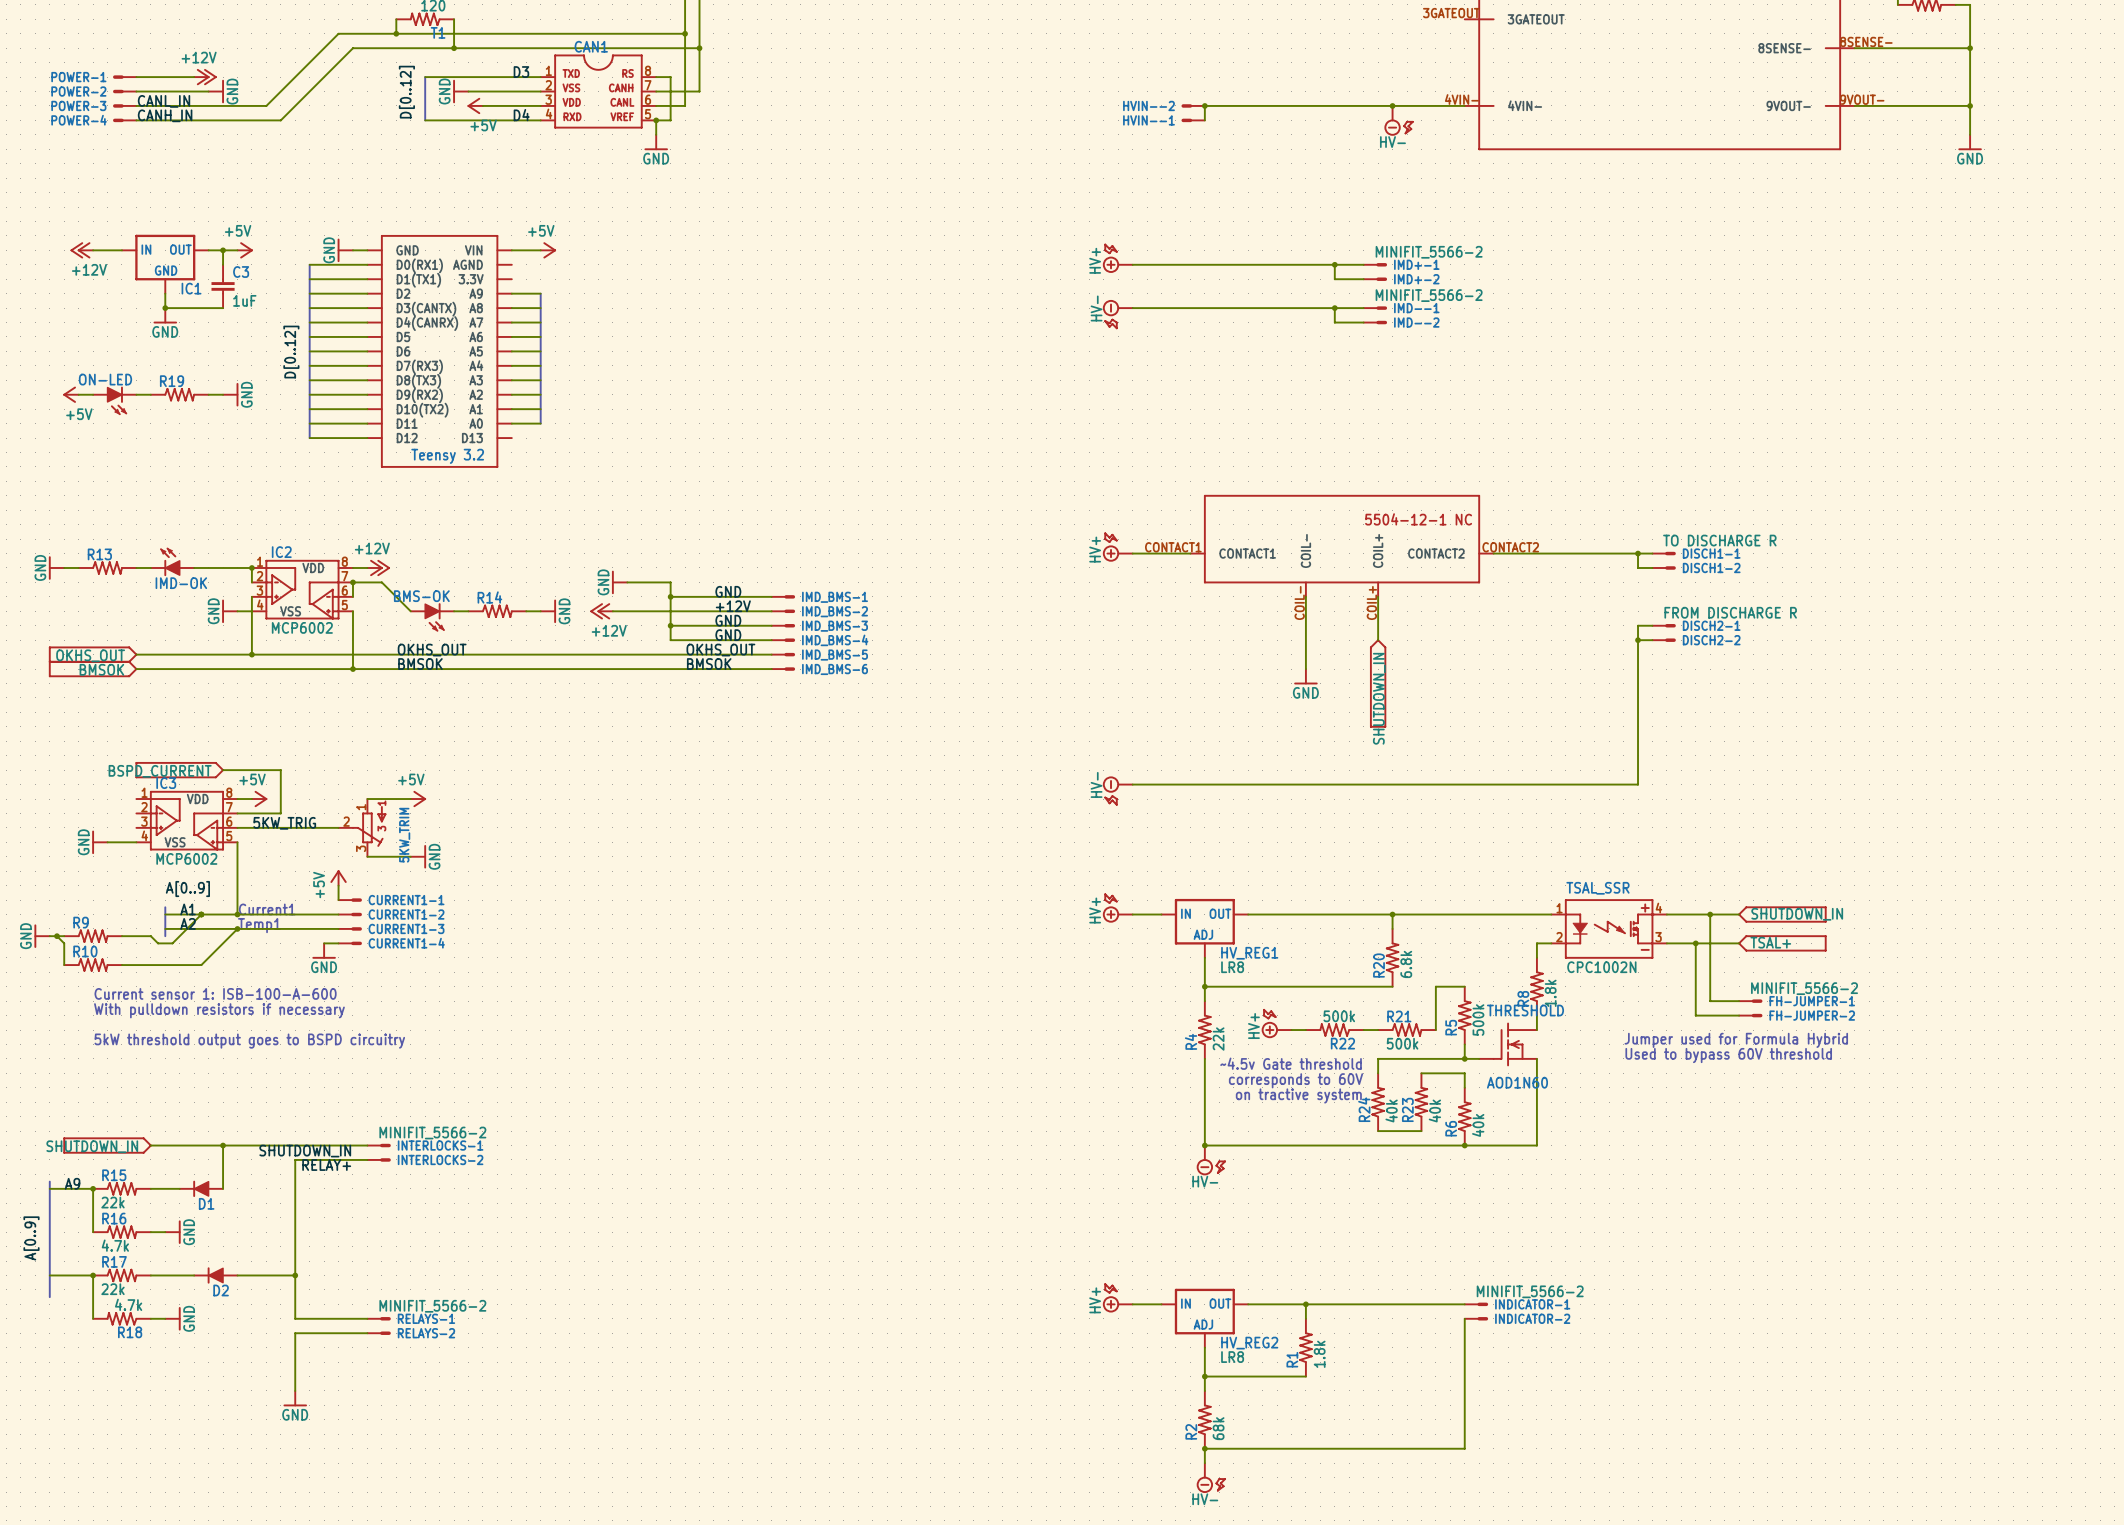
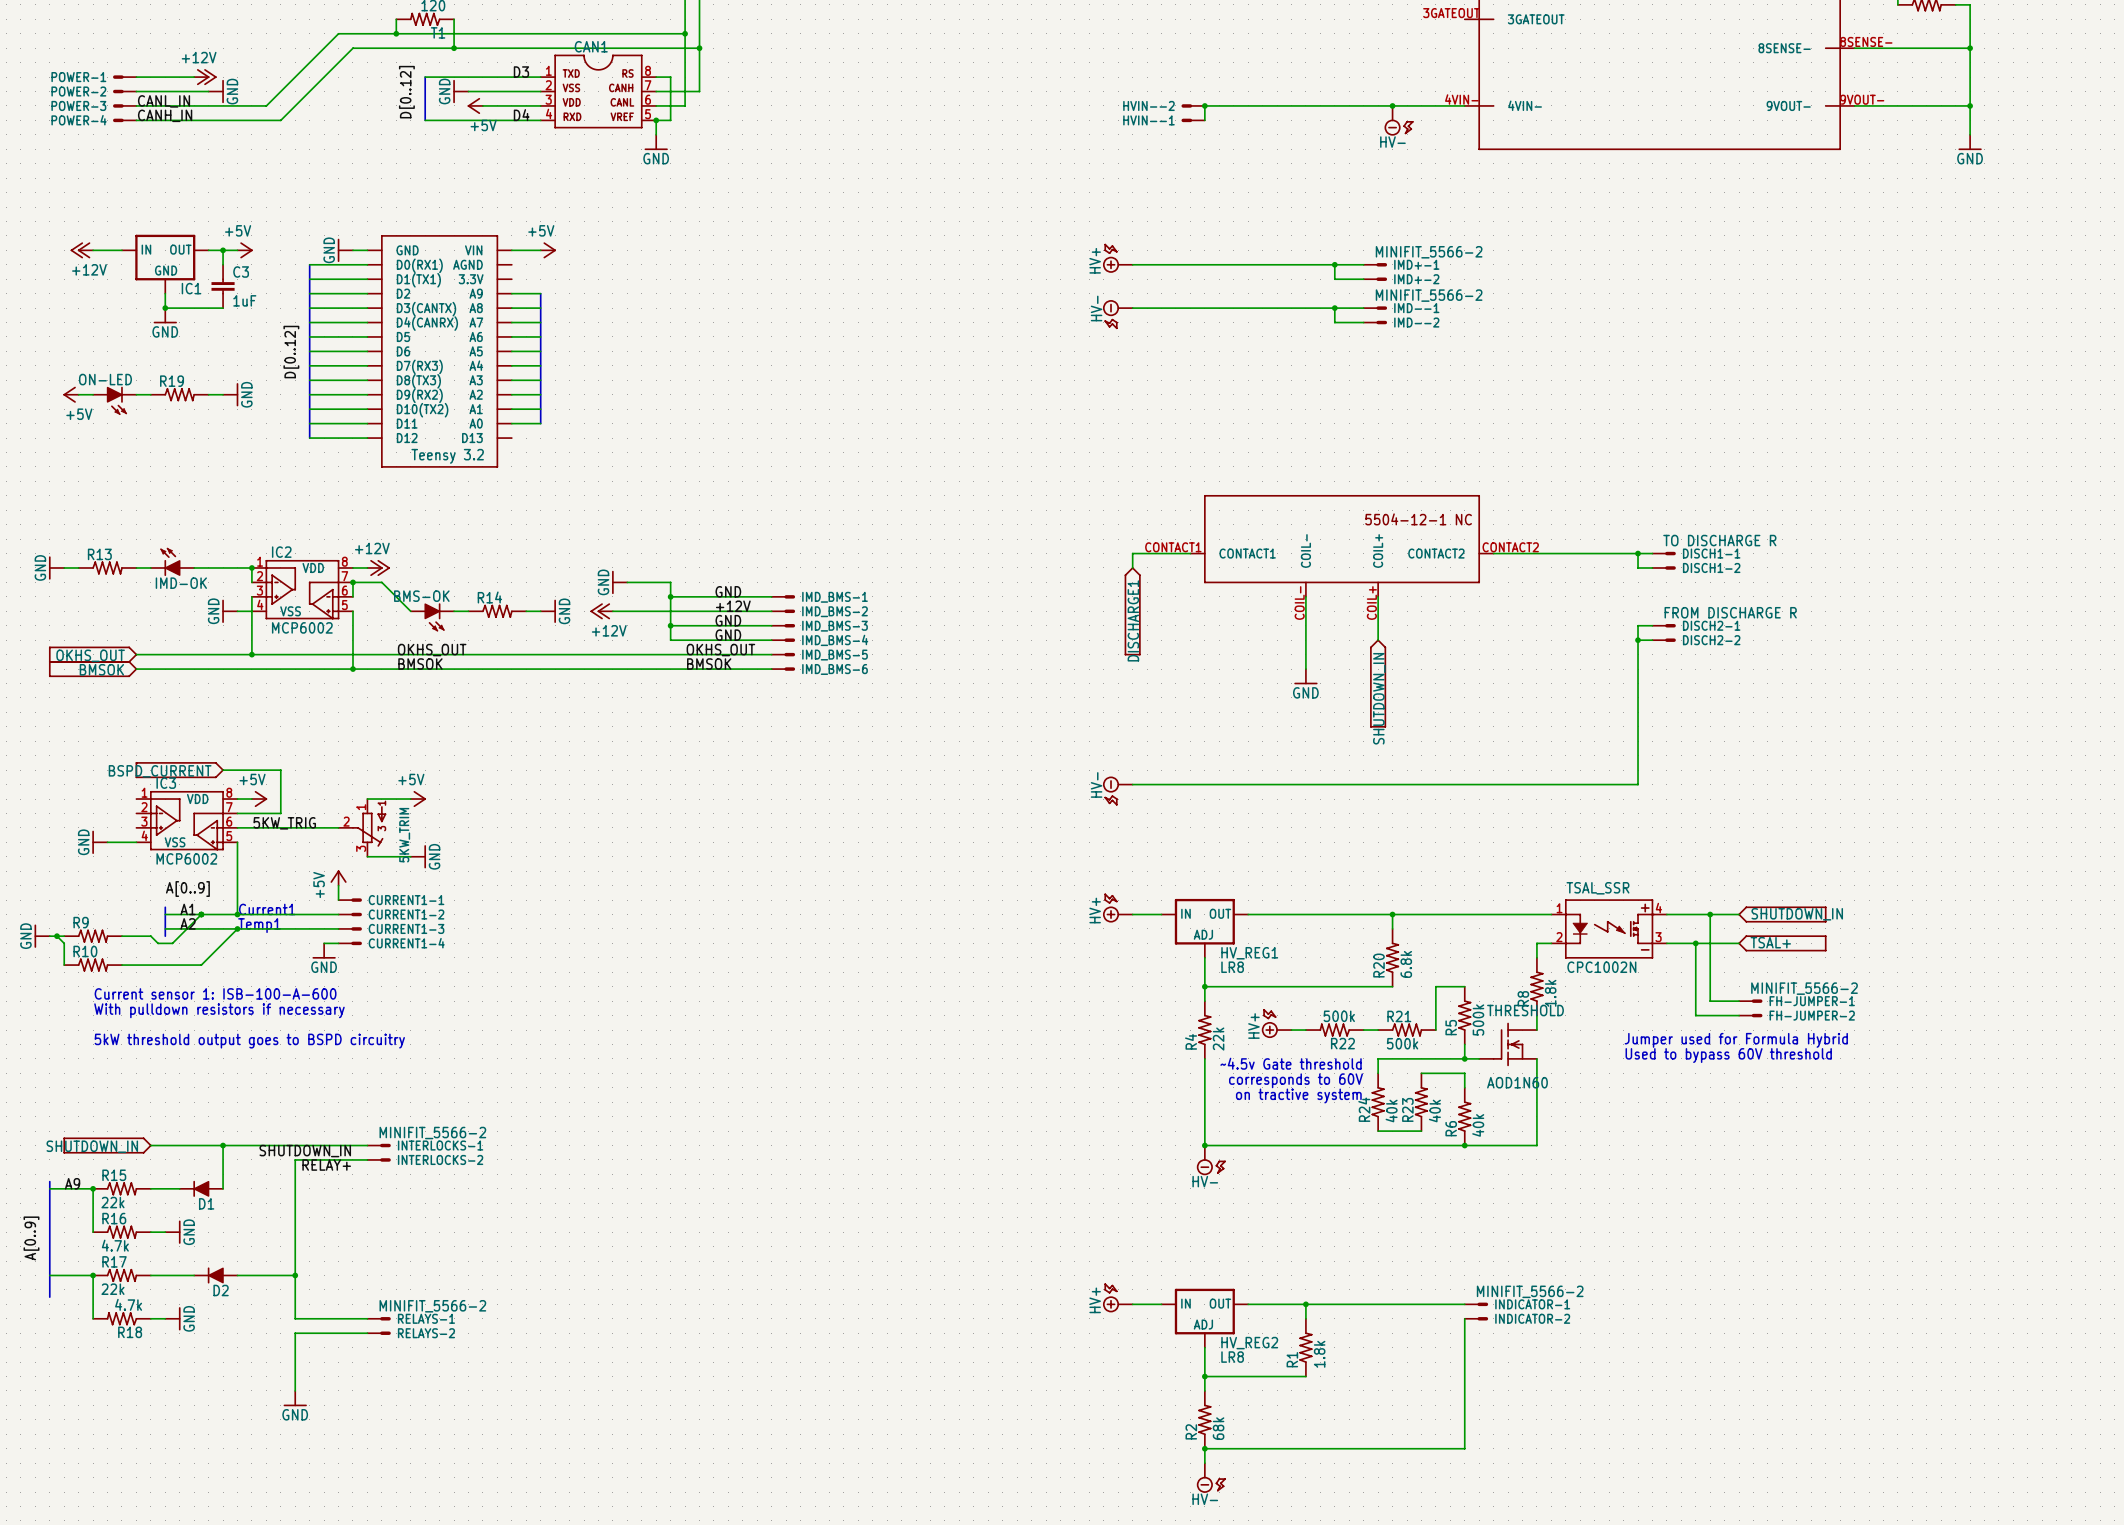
power symbol: HV+ (1117, 547) -> none
wire: none -> (1132, 553) (1132, 567)
part: none -> DISCHARGE1 (1132, 611)

